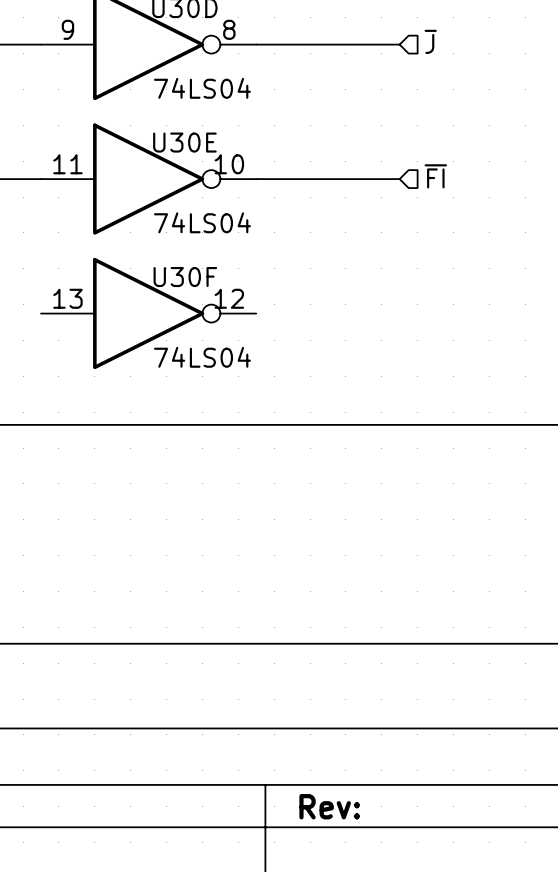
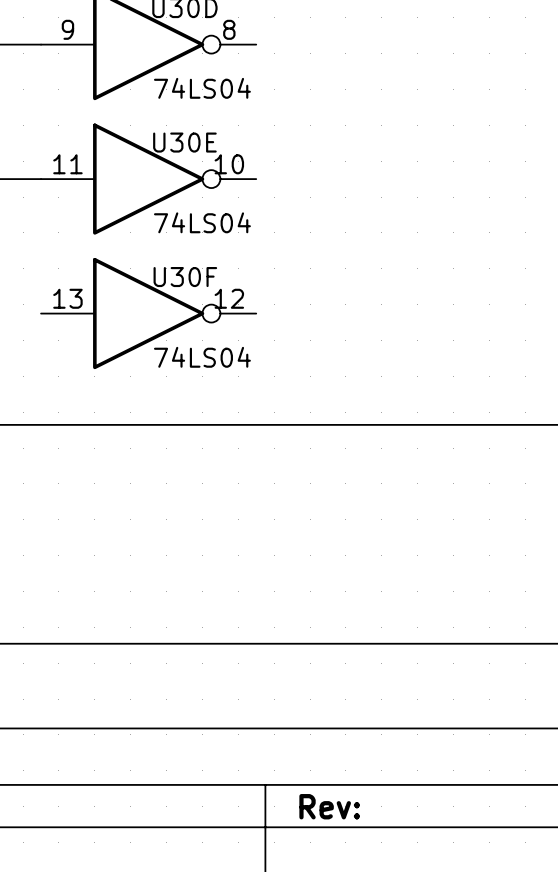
hierarchical label: ~{J} (430, 41) -> none
wire: (256, 44) (399, 44) -> none
hierarchical label: ~{FI} (435, 176) -> none
wire: (256, 179) (399, 179) -> none

